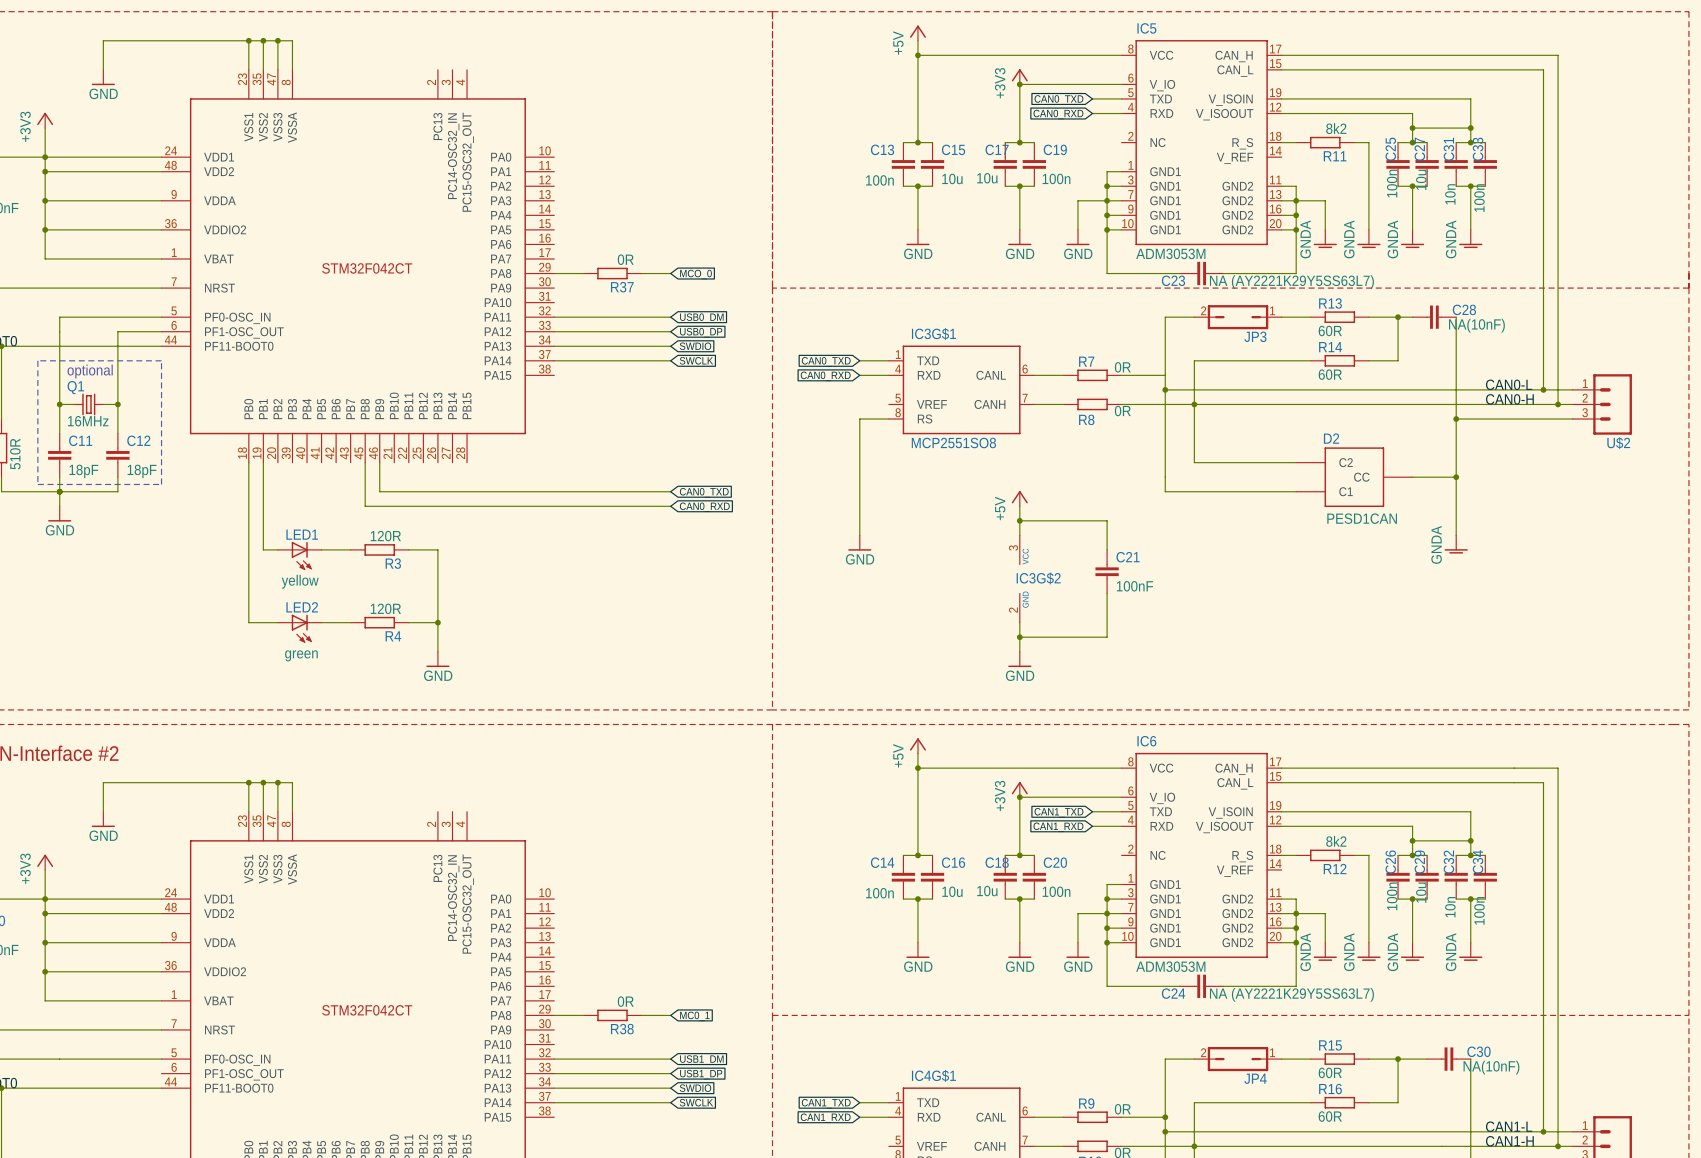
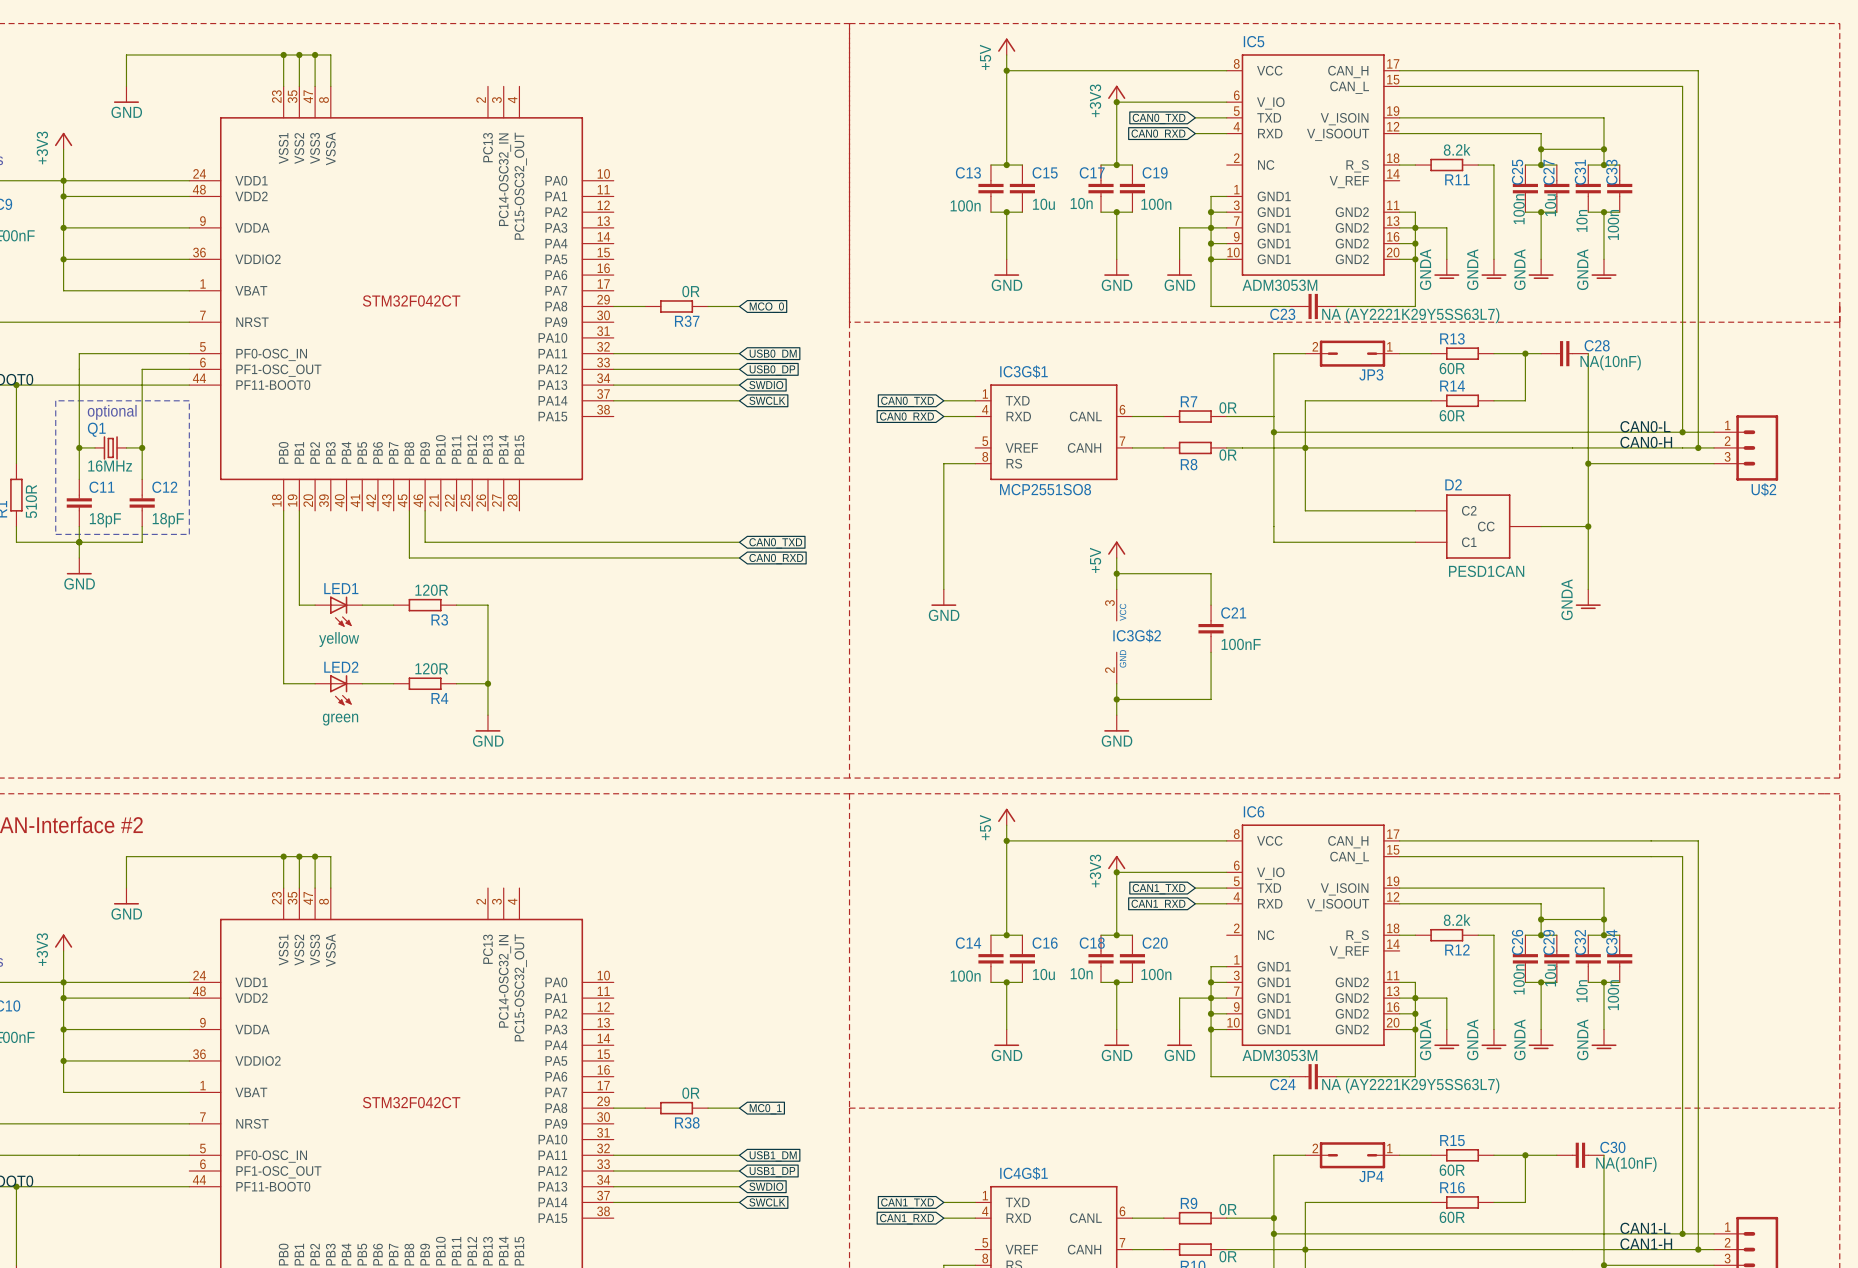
R11 value: 8k2 (1336, 128) -> 8.2k (1457, 149)
C17 value: 10u (987, 178) -> 10n (1081, 203)
R12 value: 8k2 (1336, 841) -> 8.2k (1457, 920)
C18 value: 10u (987, 891) -> 10n (1081, 973)

